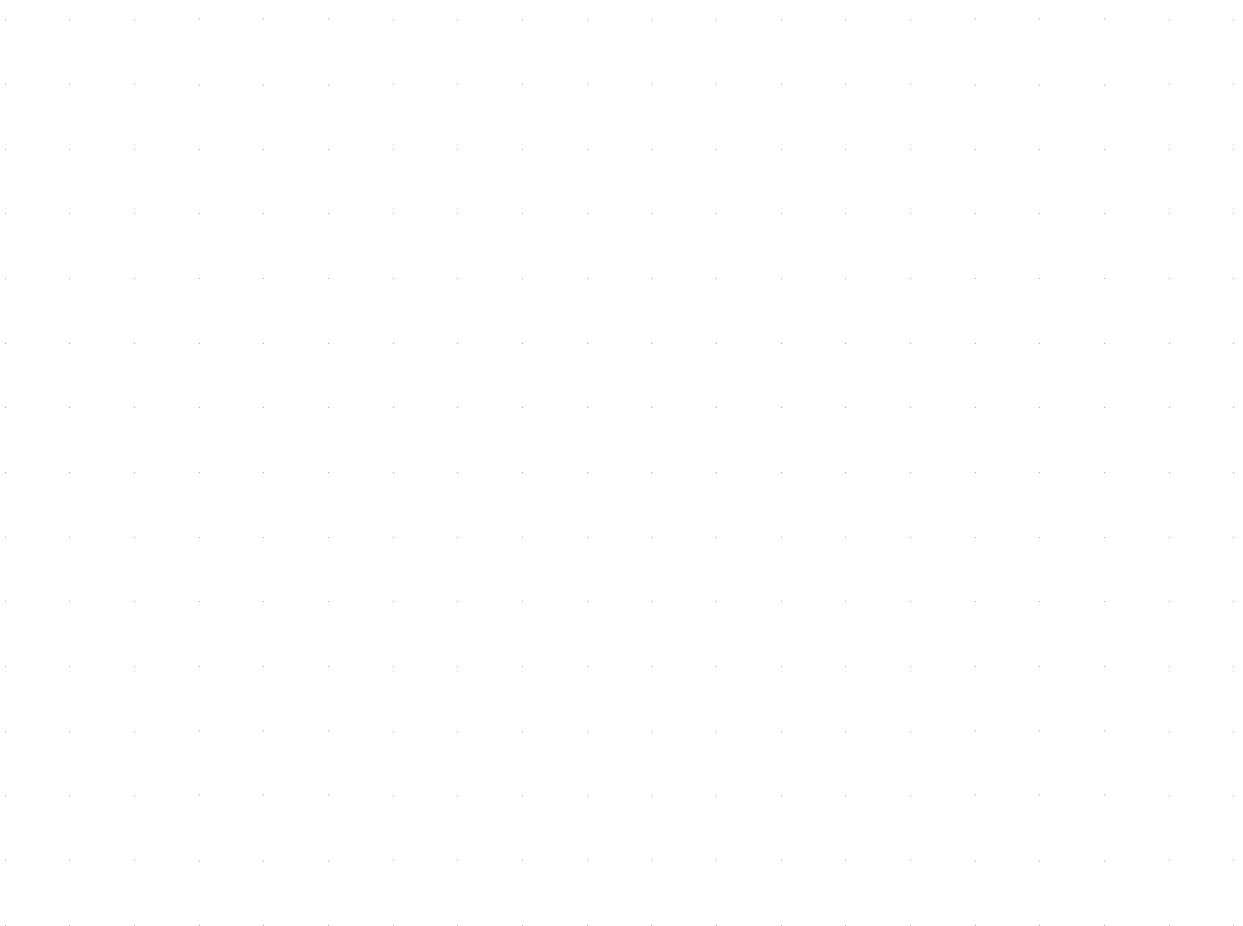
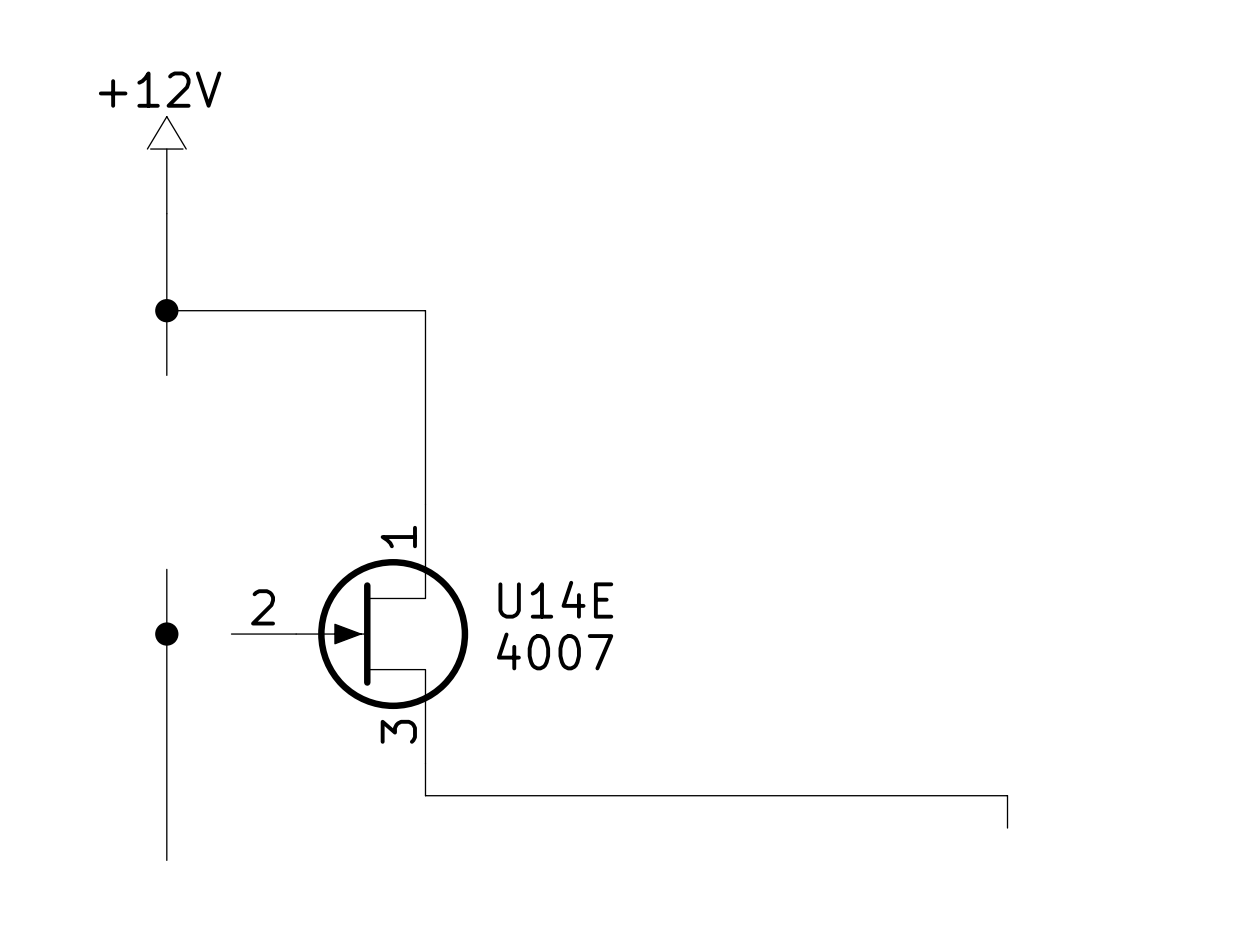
part: none -> +12V (166, 165)
wire: none -> (166, 213) (166, 375)
wire: none -> (166, 310) (425, 310) (425, 504)
junction: none -> (166, 310)
wire: none -> (166, 569) (166, 860)
junction: none -> (166, 634)
U14E: none -> 4007 (349, 634)
wire: none -> (425, 763) (425, 795) (1007, 795) (1007, 828)

